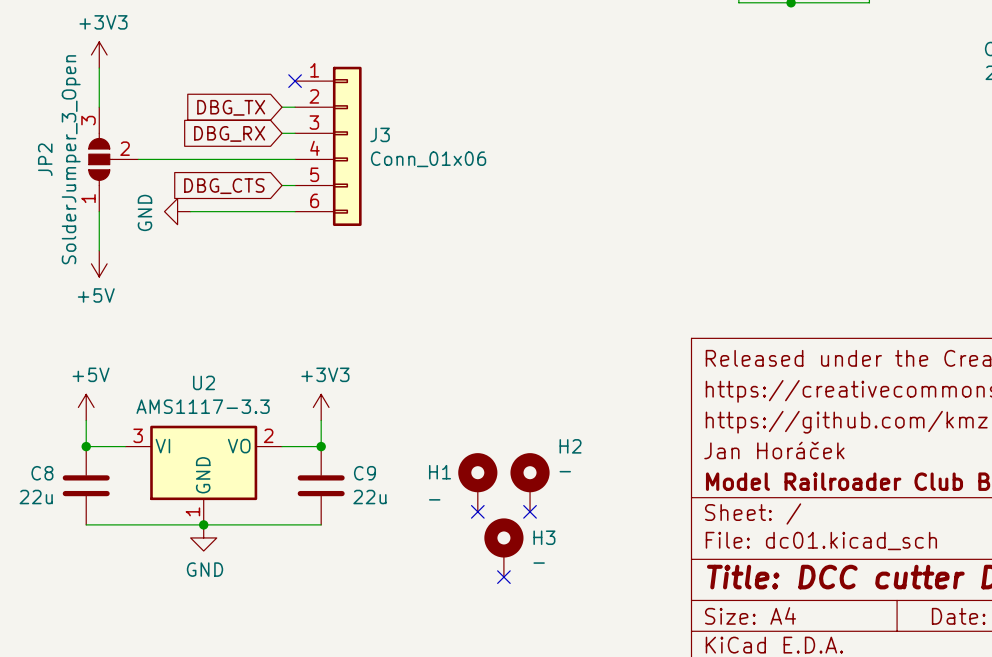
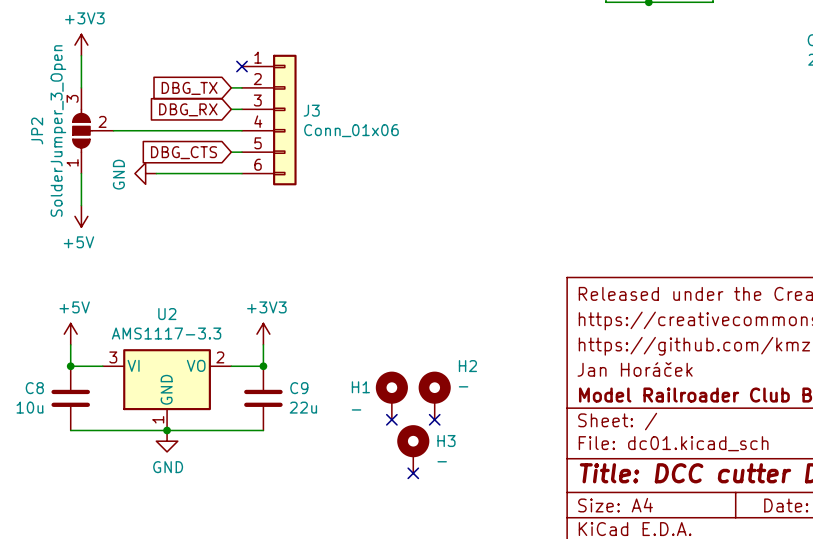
C8 value: 22u (36, 497) -> 10u (29, 407)

